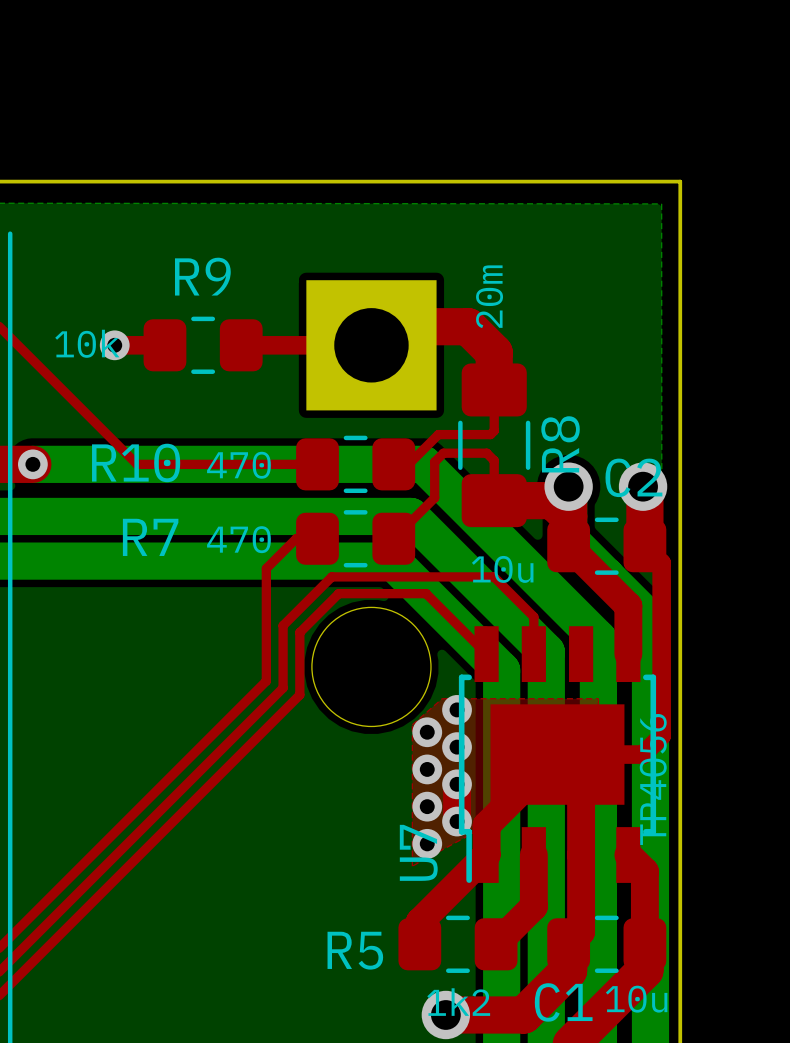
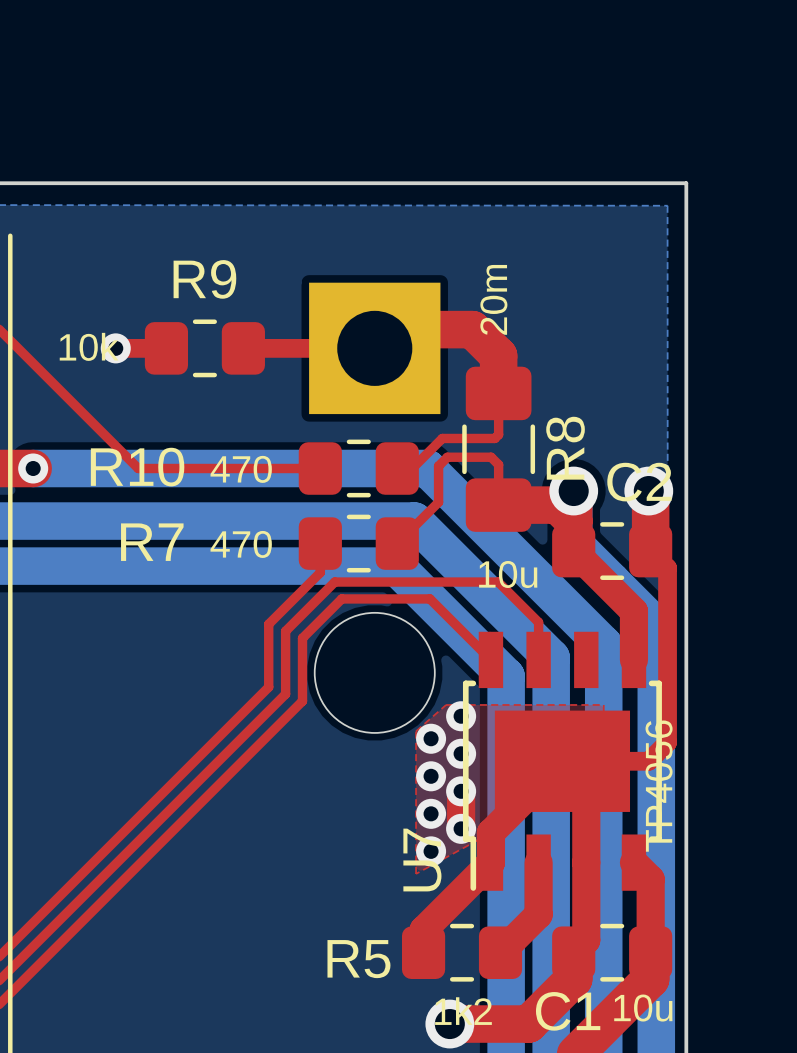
top track: (317, 538) (296, 538) (266, 568) (266, 618) -> (320, 543) (320, 572) (268, 624)

